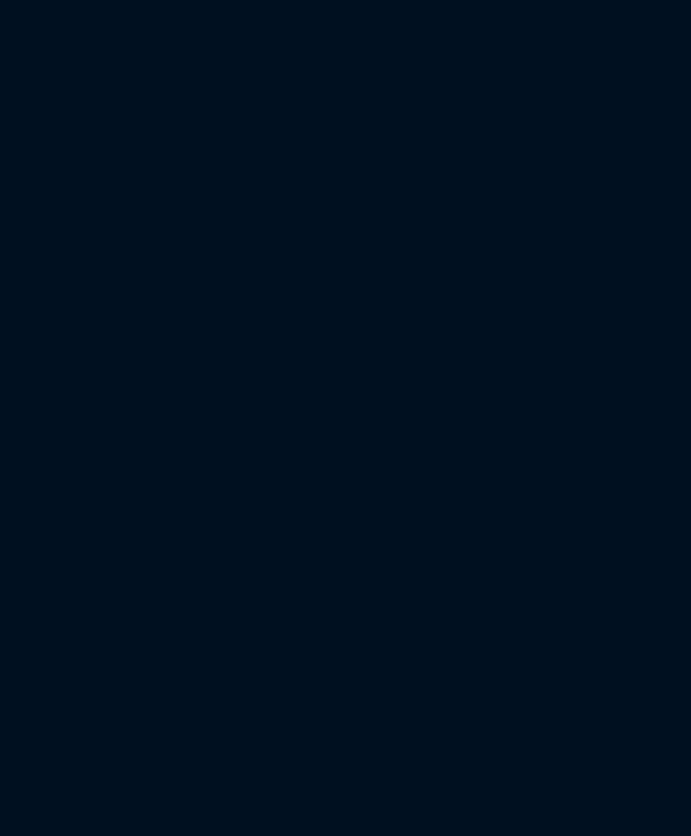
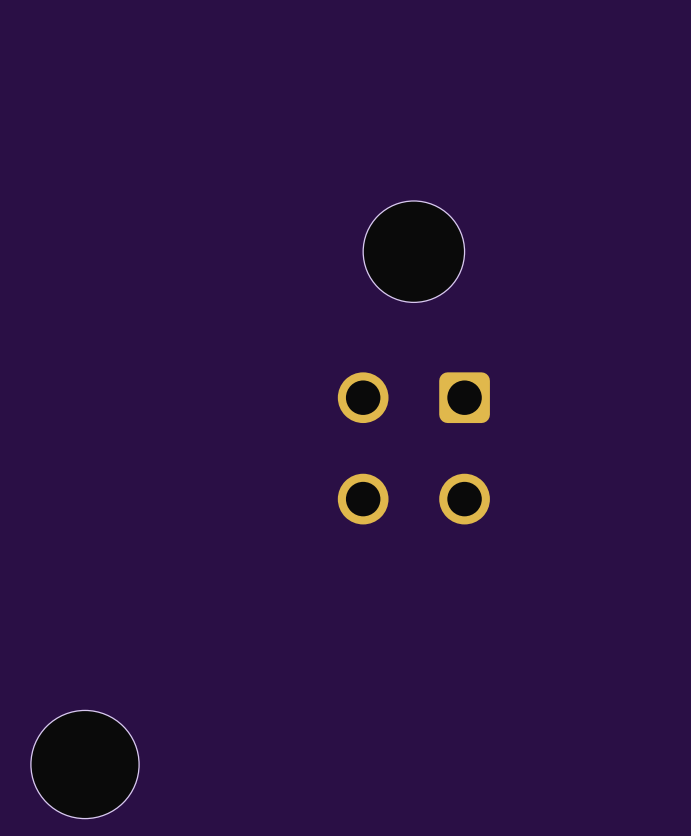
part: none -> (413, 362)
part: none -> (85, 764)

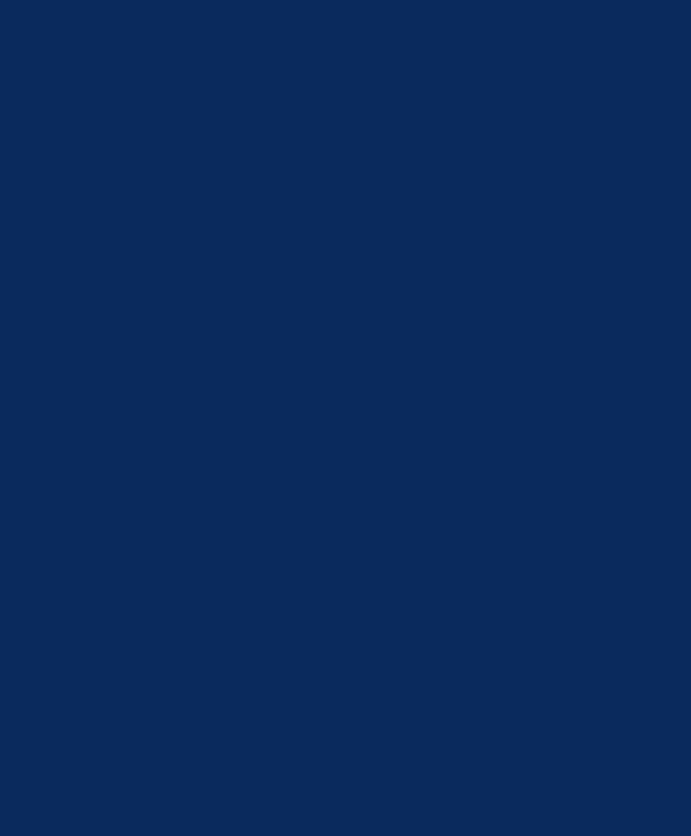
part: (413, 362) -> none
part: (85, 764) -> none

